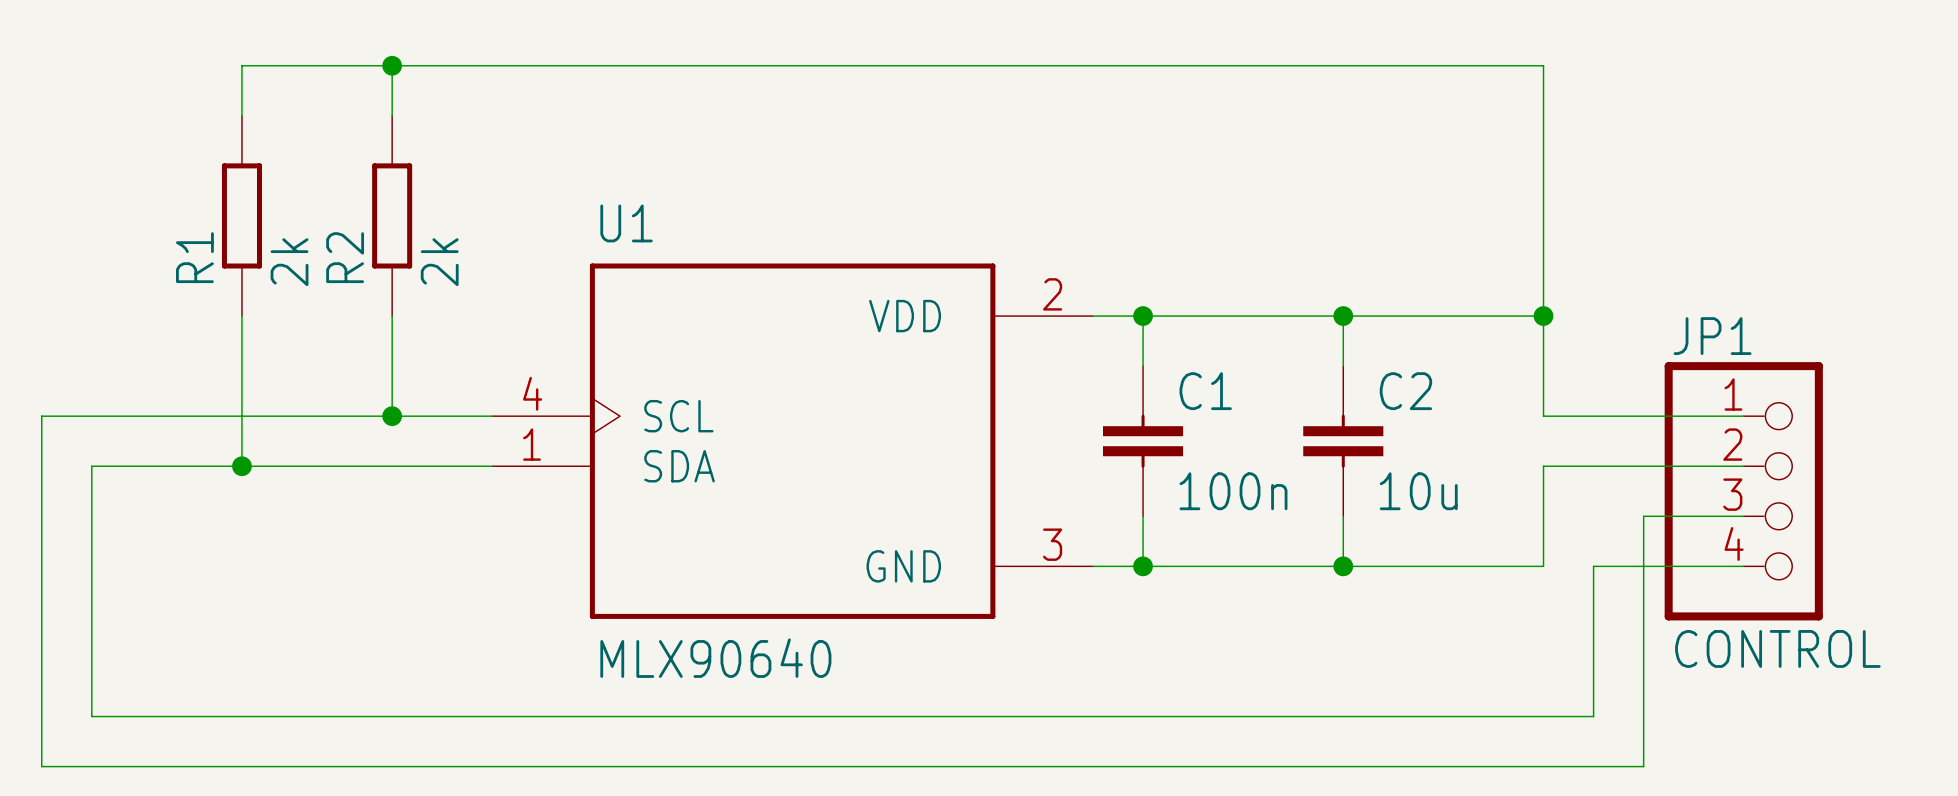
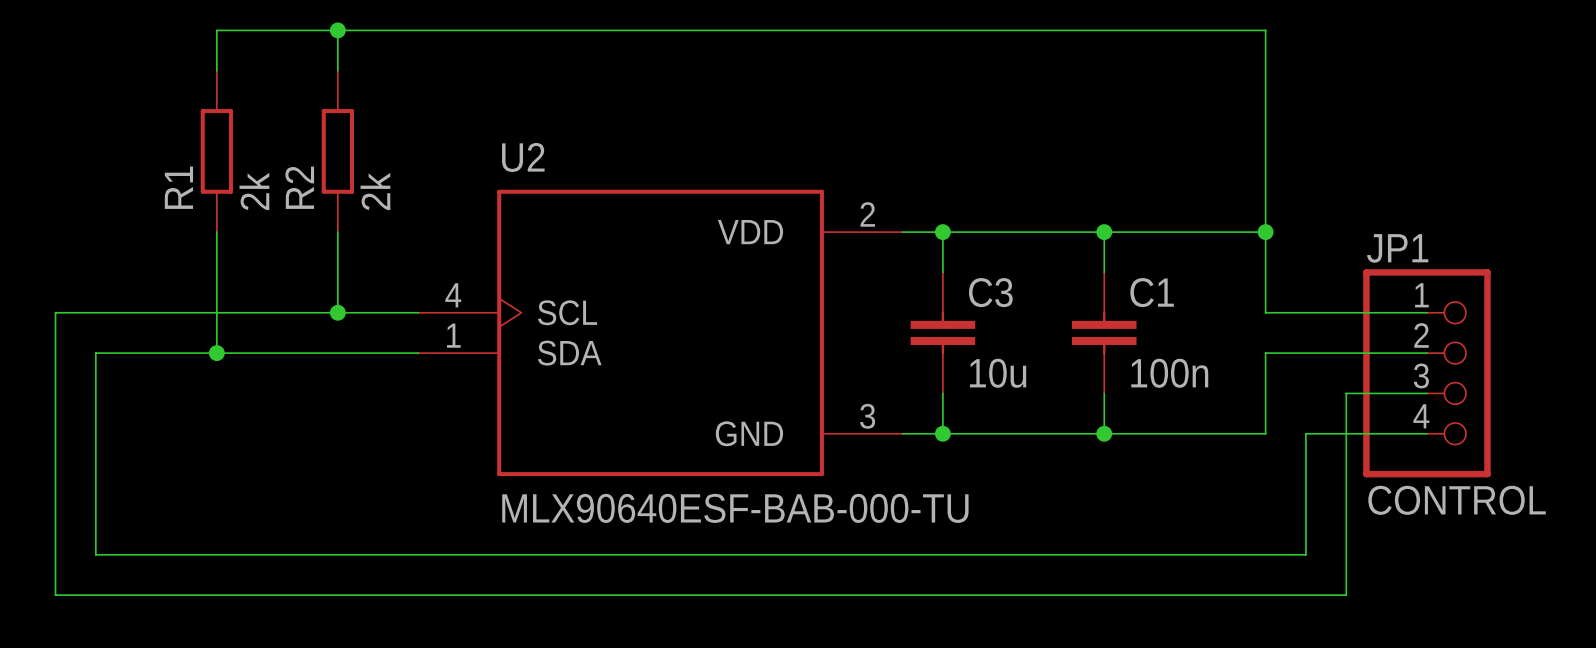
U1 name: U1 (626, 223) -> U2 (523, 157)
C1 name: C1 (1205, 391) -> C3 (990, 292)
C2 name: C2 (1405, 391) -> C1 (1152, 292)
C1 value: 100n (1233, 491) -> 10u (998, 373)
C2 value: 10u (1418, 491) -> 100n (1169, 373)
U1 value: MLX90640 (715, 658) -> MLX90640ESF-BAB-000-TU (735, 508)

